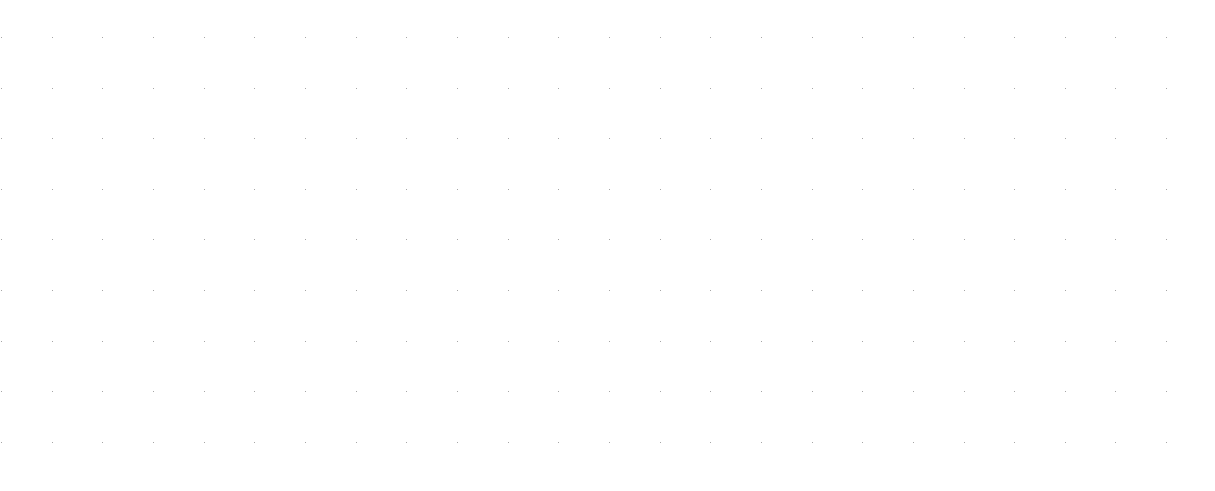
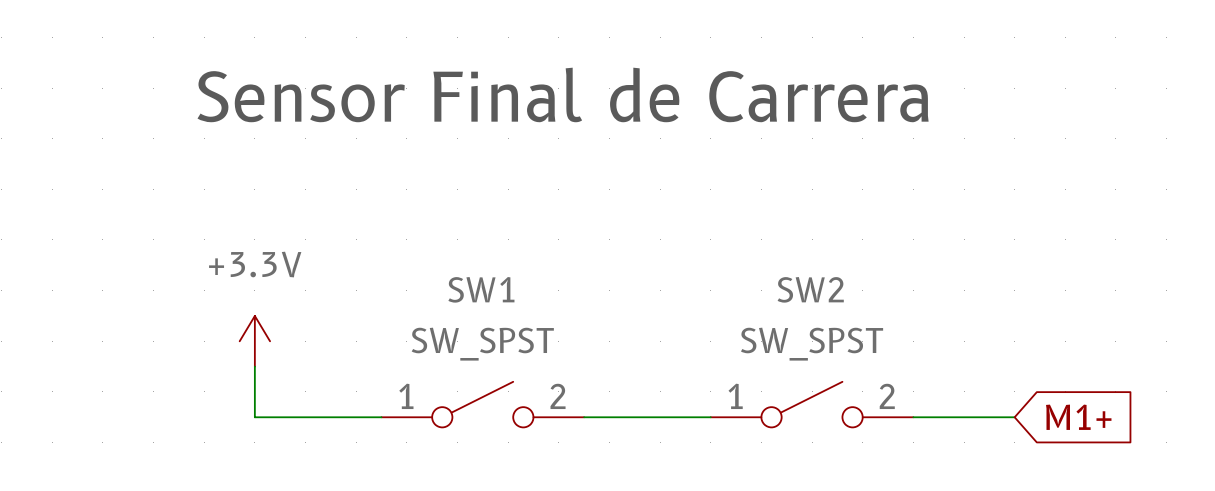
text: none -> Sensor Final de Carrera (563, 94)
power symbol: none -> +3.3V (254, 341)
wire: none -> (254, 366) (254, 417) (381, 417)
SW1: none -> SW_SPST (482, 404)
SW2: none -> SW_SPST (812, 404)
wire: none -> (584, 417) (710, 417)
wire: none -> (913, 417) (1014, 417)
global label: none -> M1+ (1078, 417)

